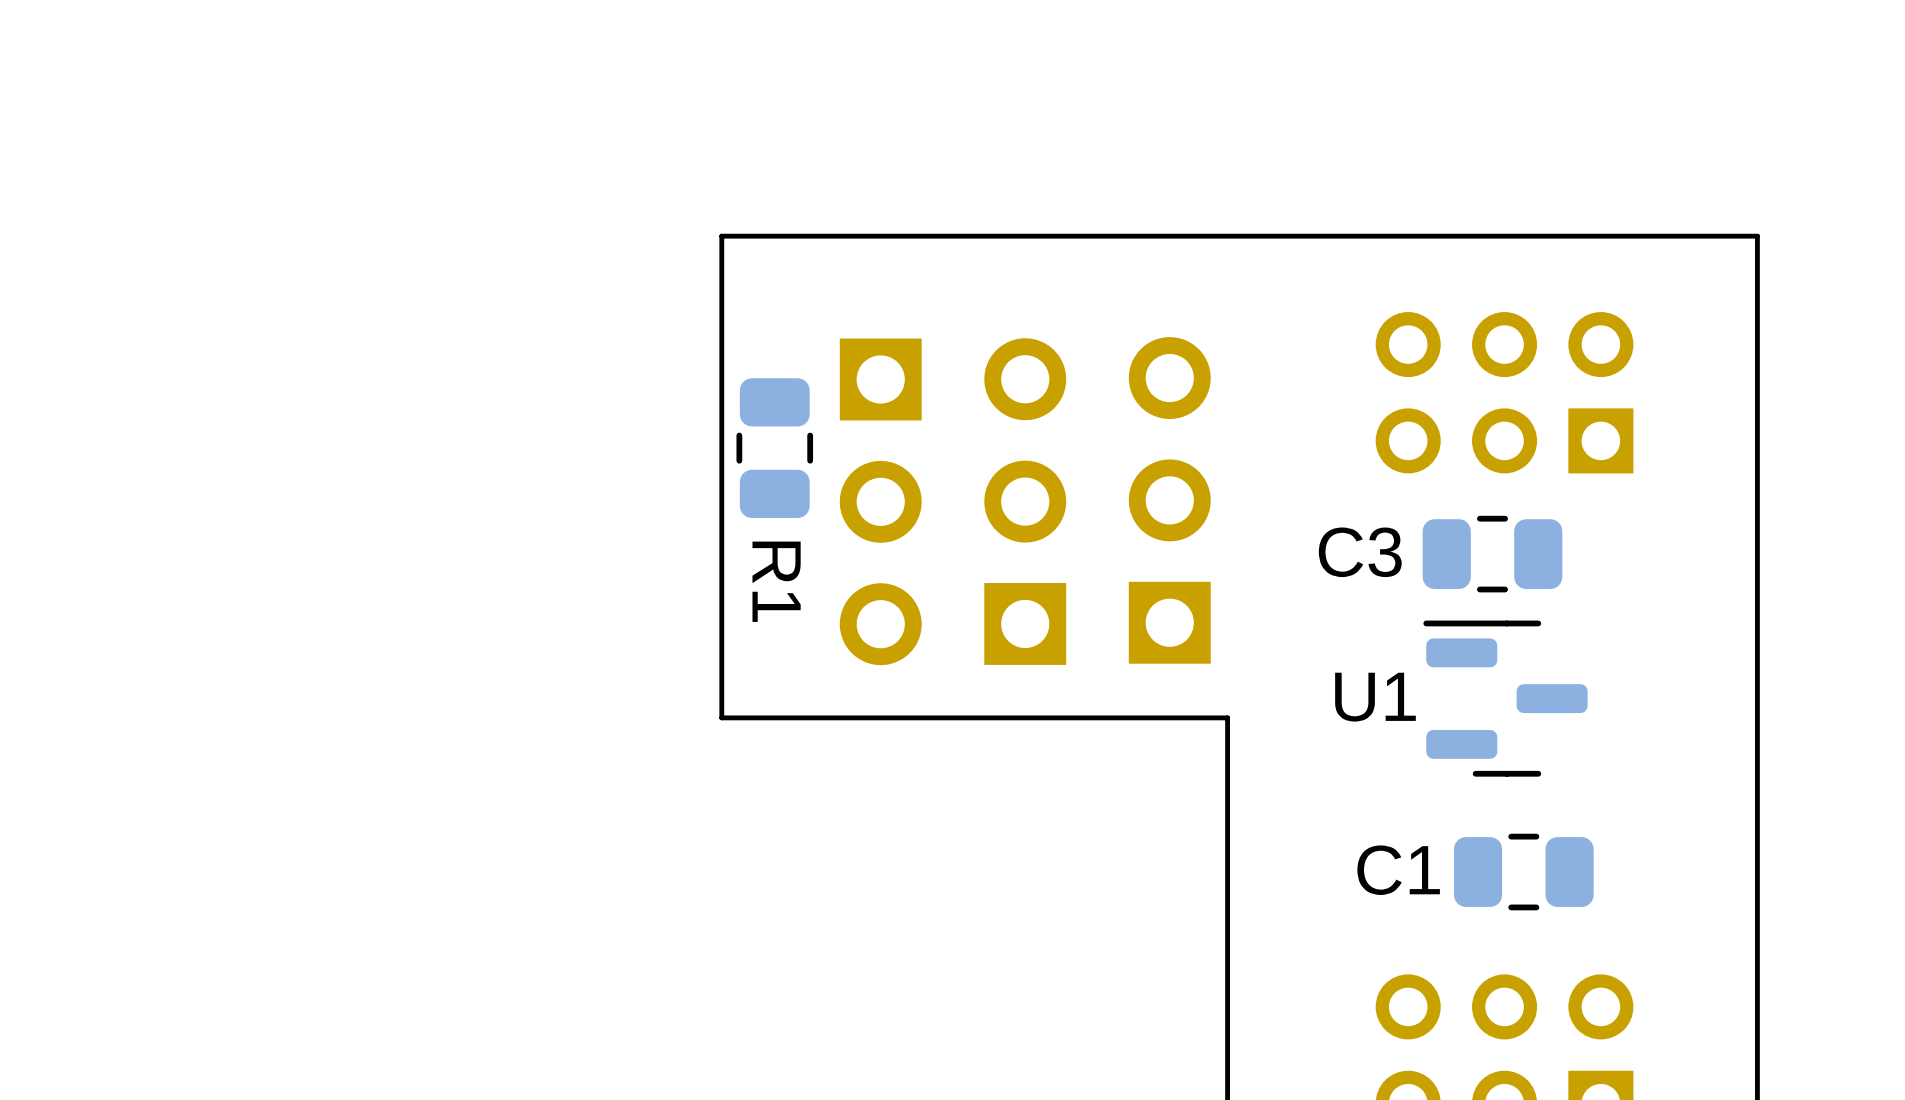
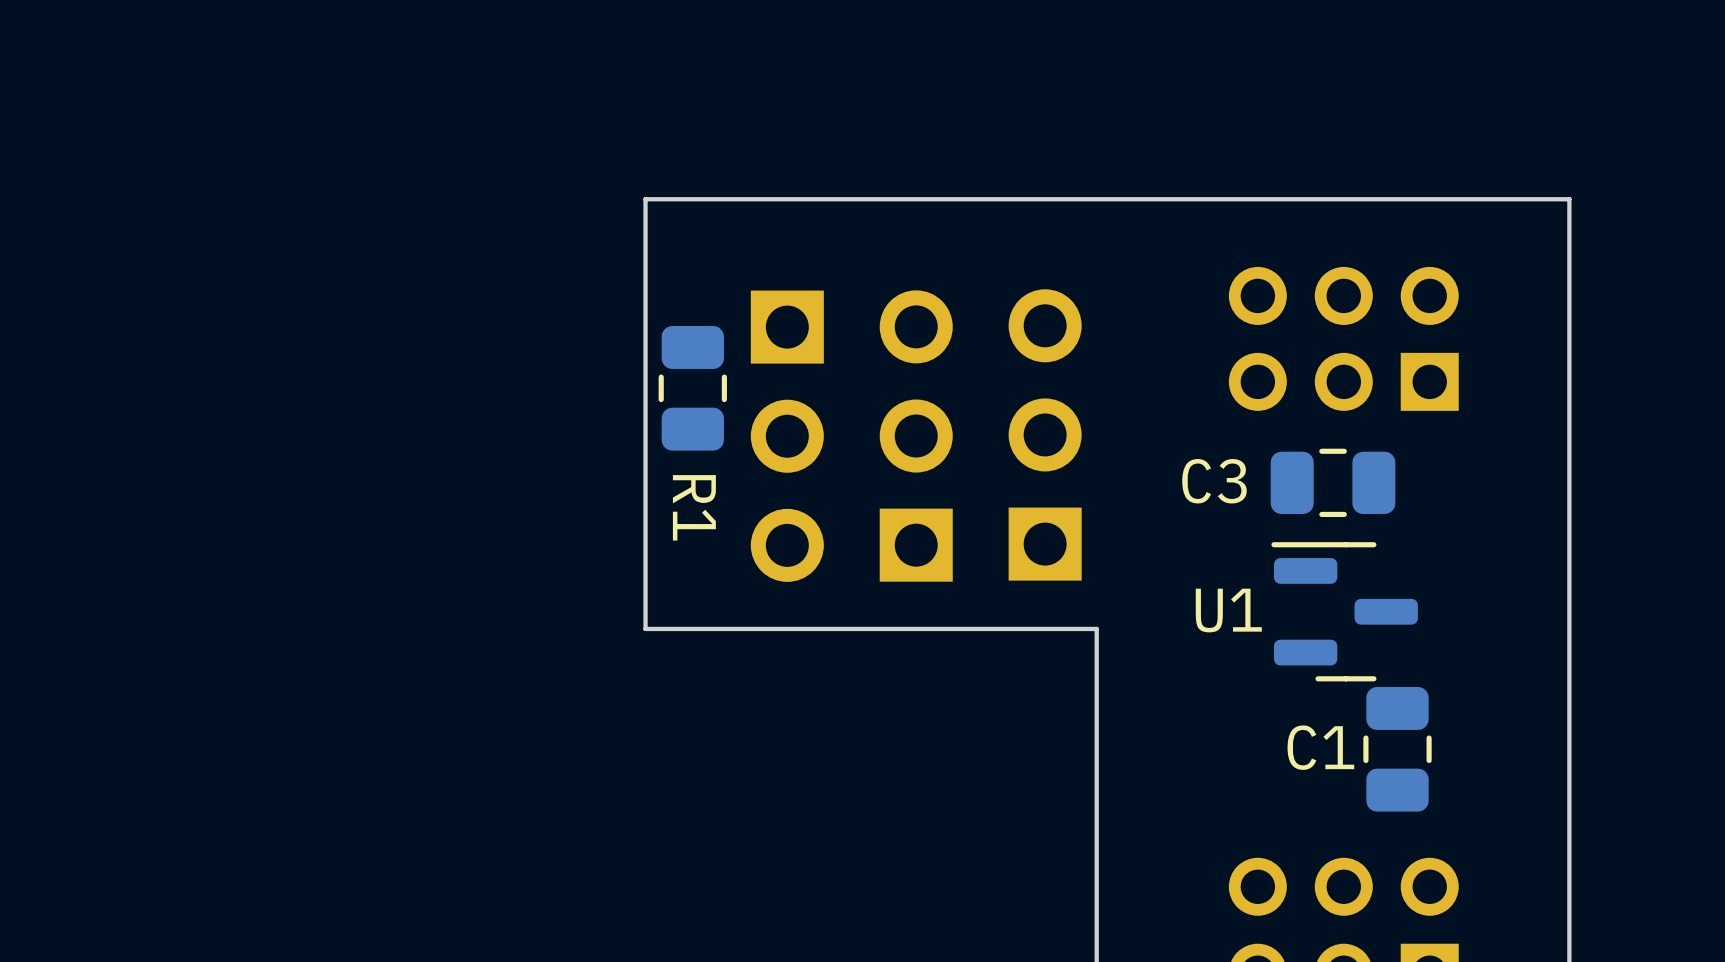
C1 rotation: 0° (1523, 872) -> 90° clockwise (1397, 749)

